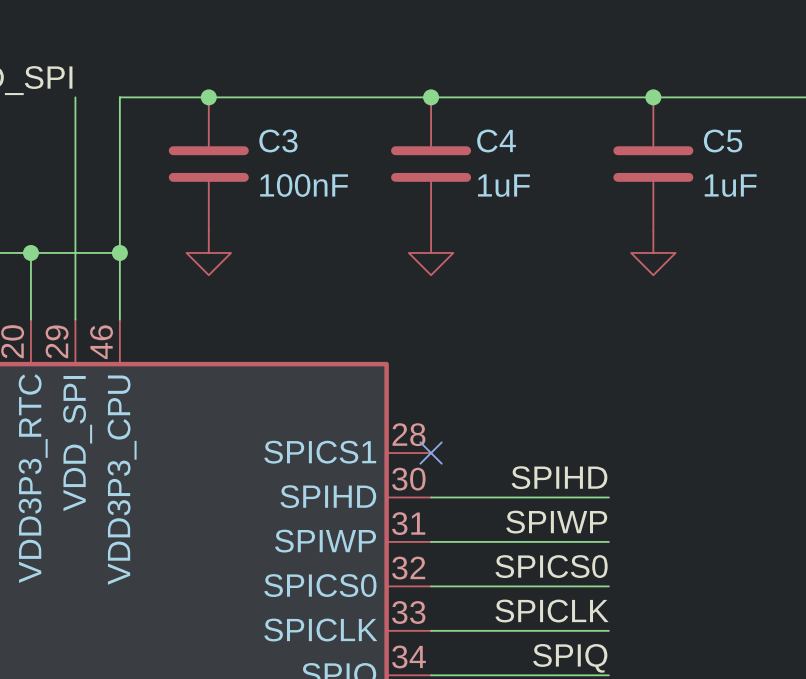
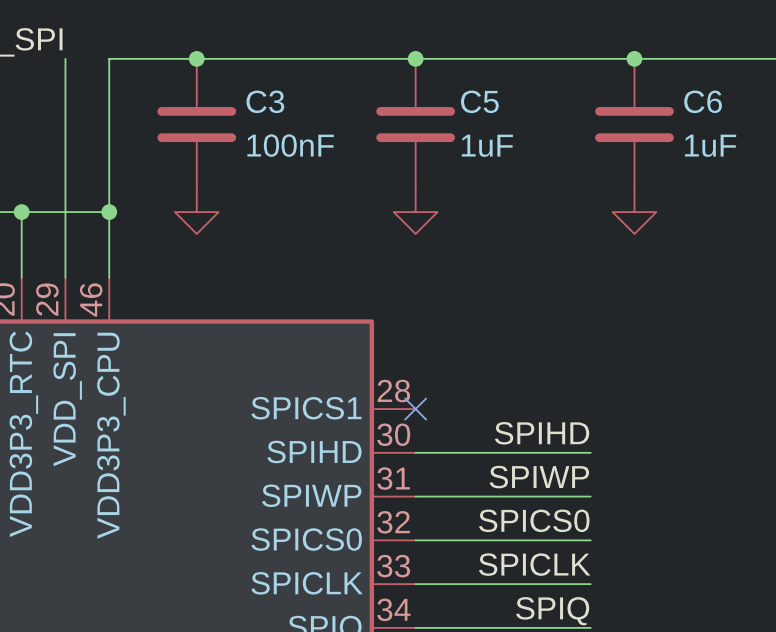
C4 name: C4 (496, 140) -> C5 (479, 101)
C5 name: C5 (723, 140) -> C6 (703, 101)

